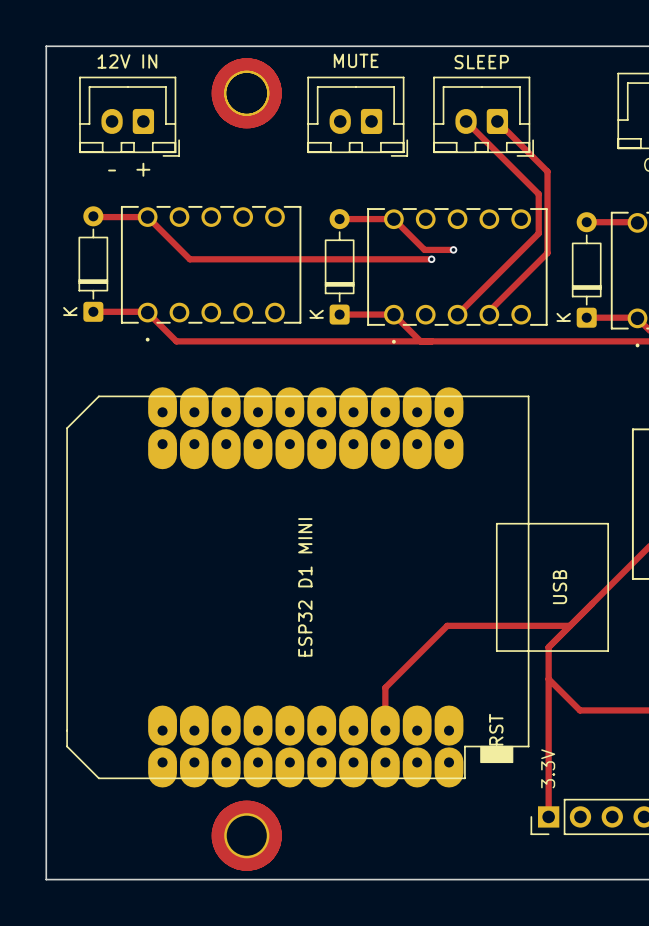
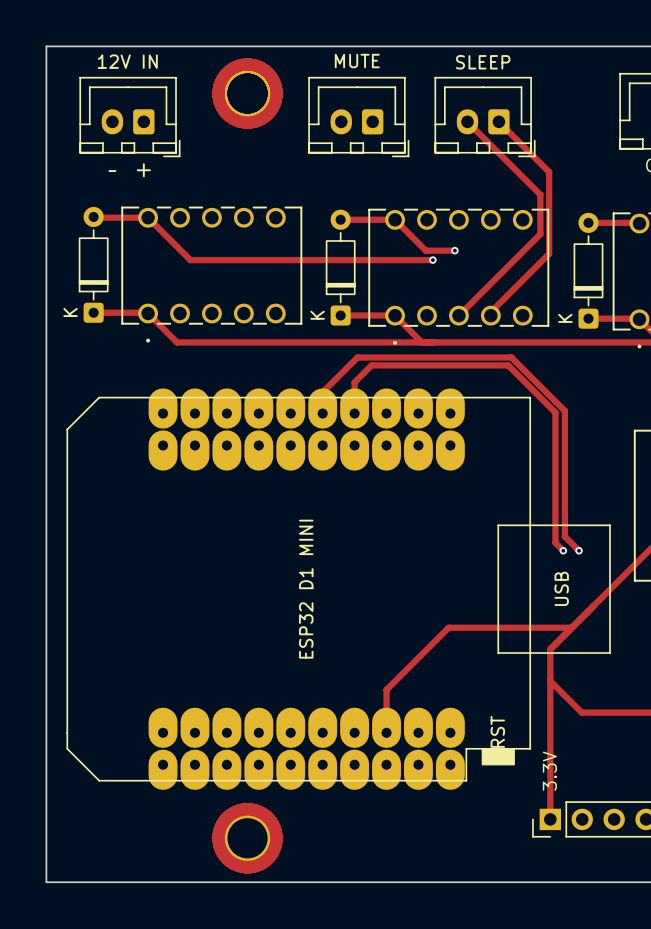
track: none -> (322, 392) (357, 357) (511, 357) (564, 410) (564, 536) (579, 550)
track: none -> (354, 413) (354, 382) (371, 365) (508, 365) (555, 412) (555, 542) (563, 550)
via: none -> (563, 550)
via: none -> (579, 550)

